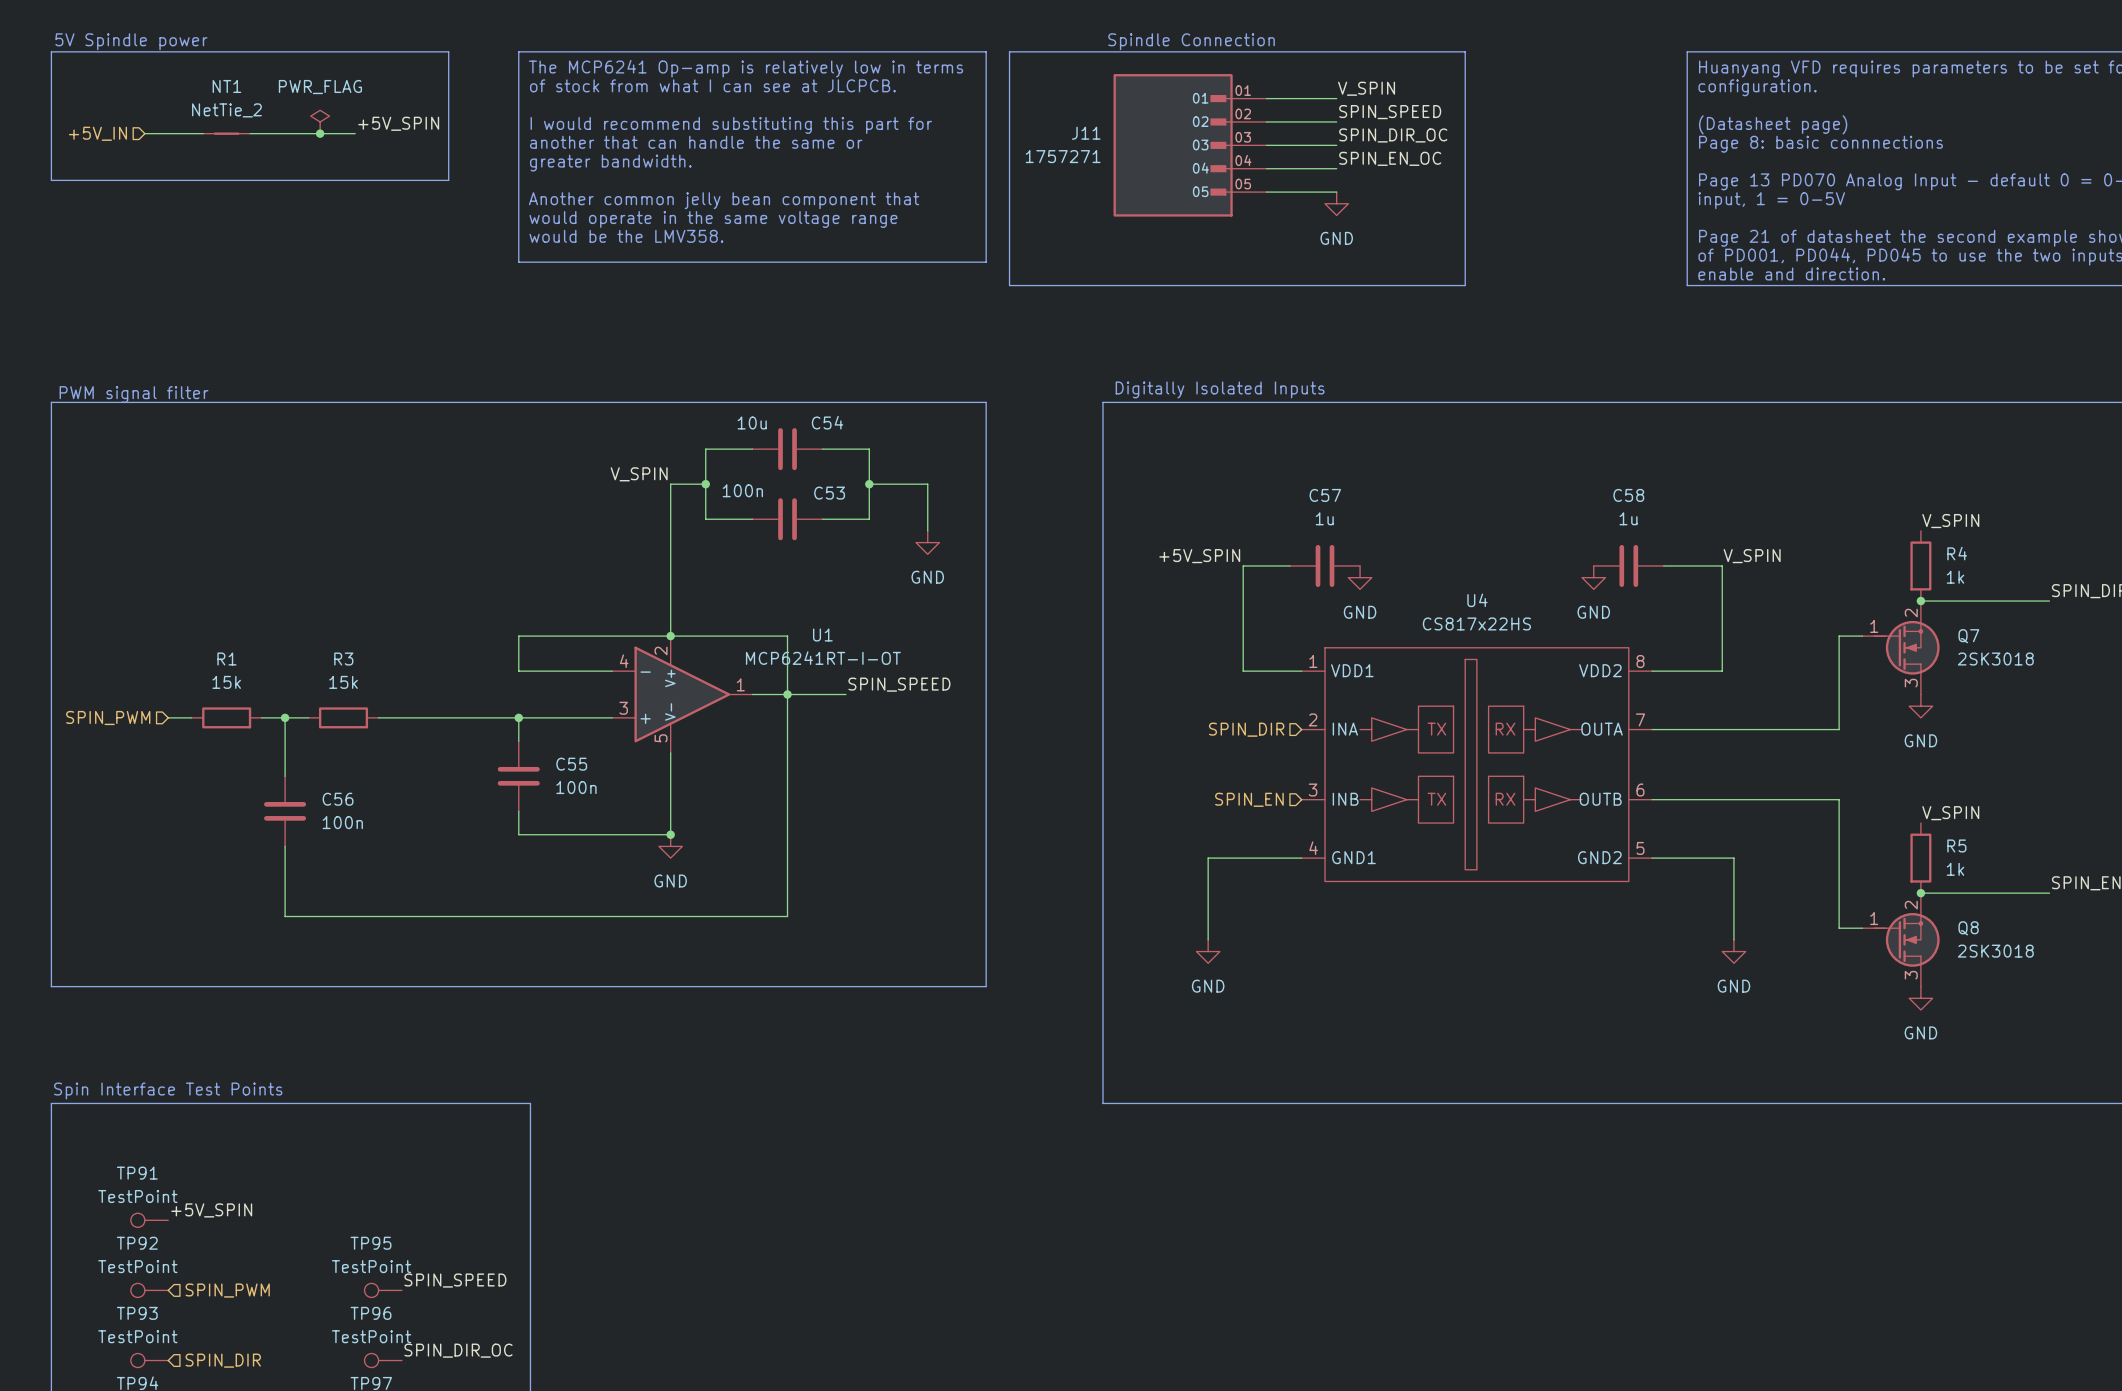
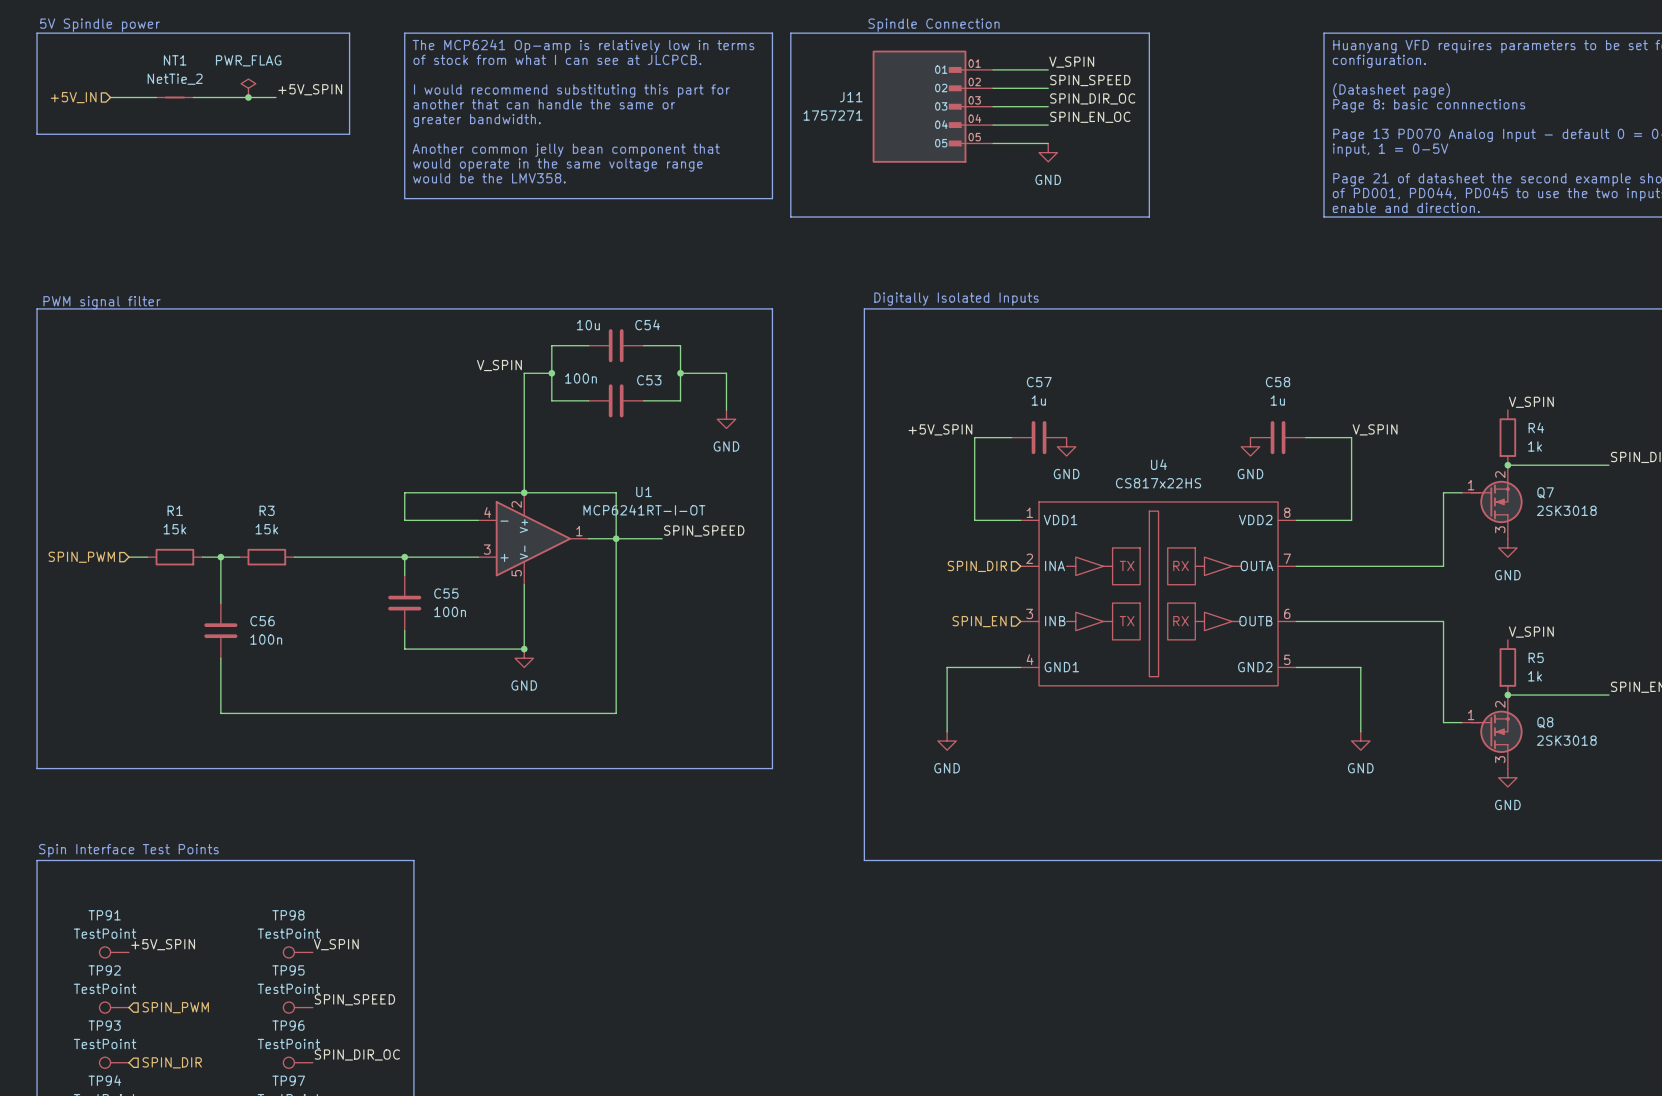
label: none -> V_SPIN (336, 944)
TP98: none -> TestPoint (298, 952)

